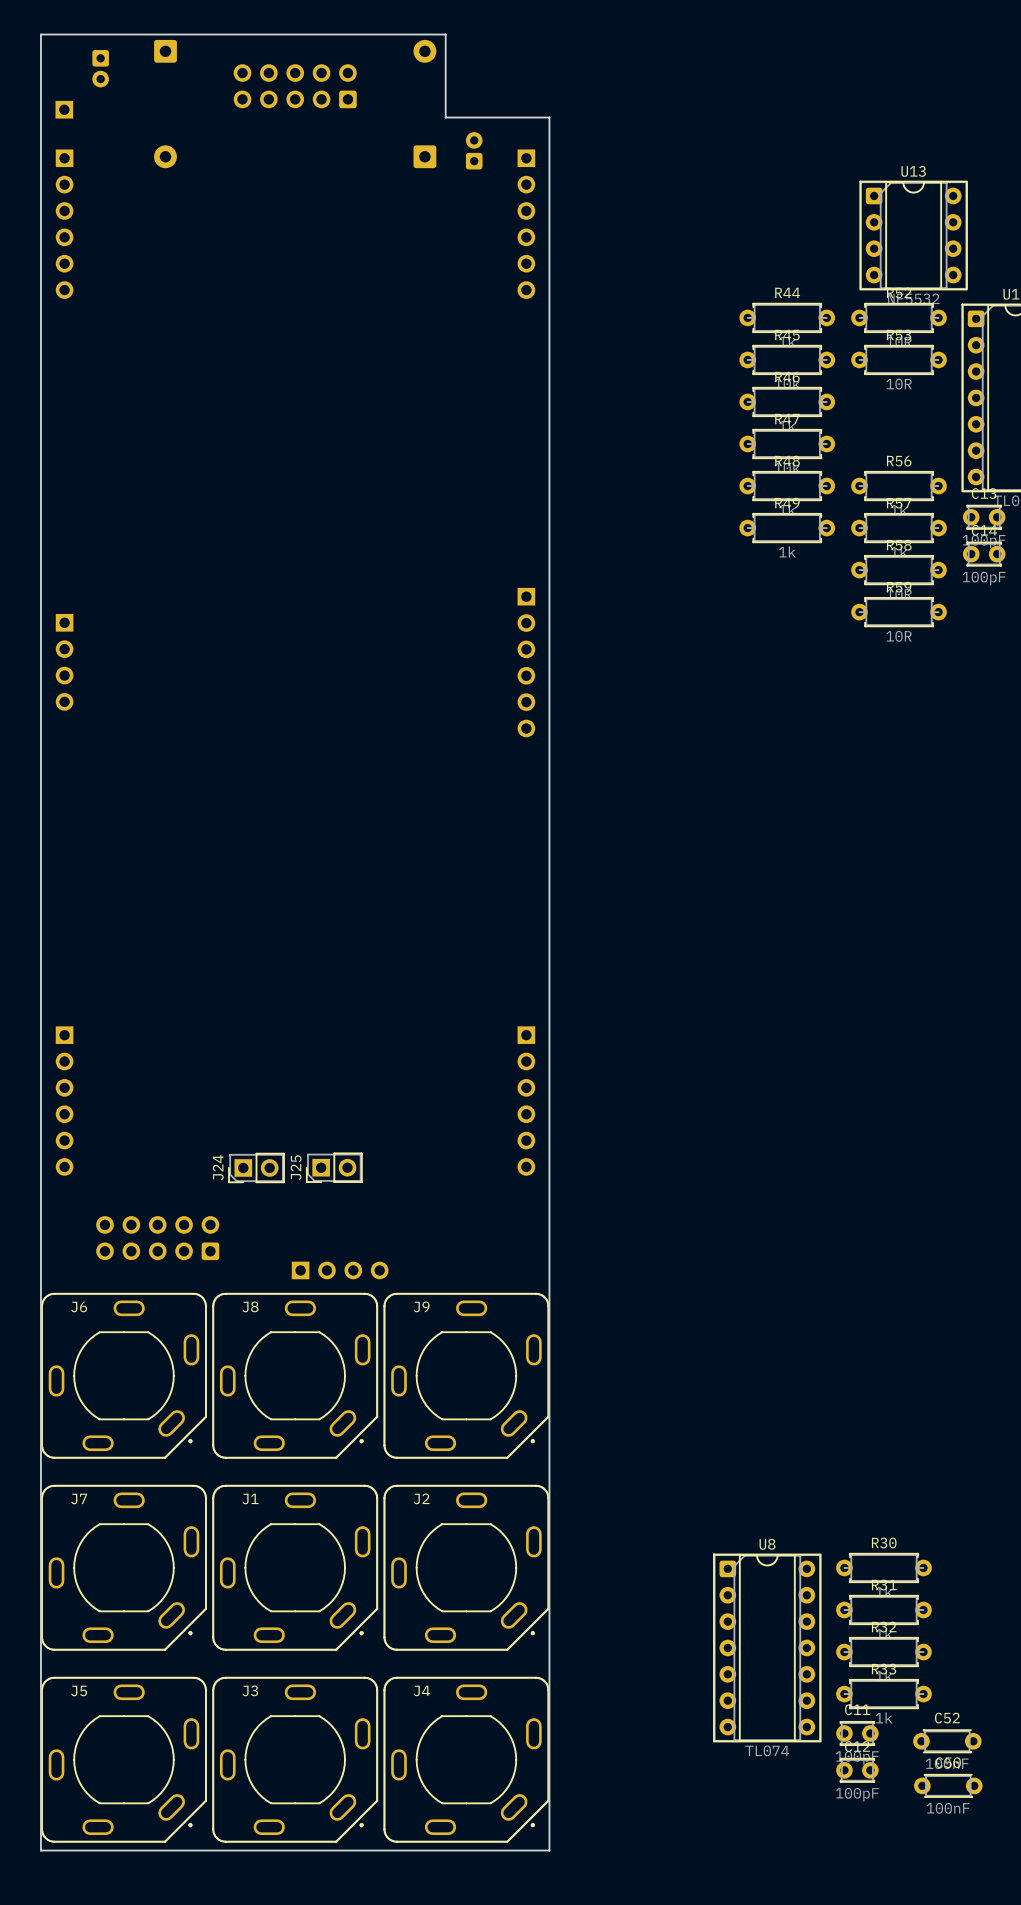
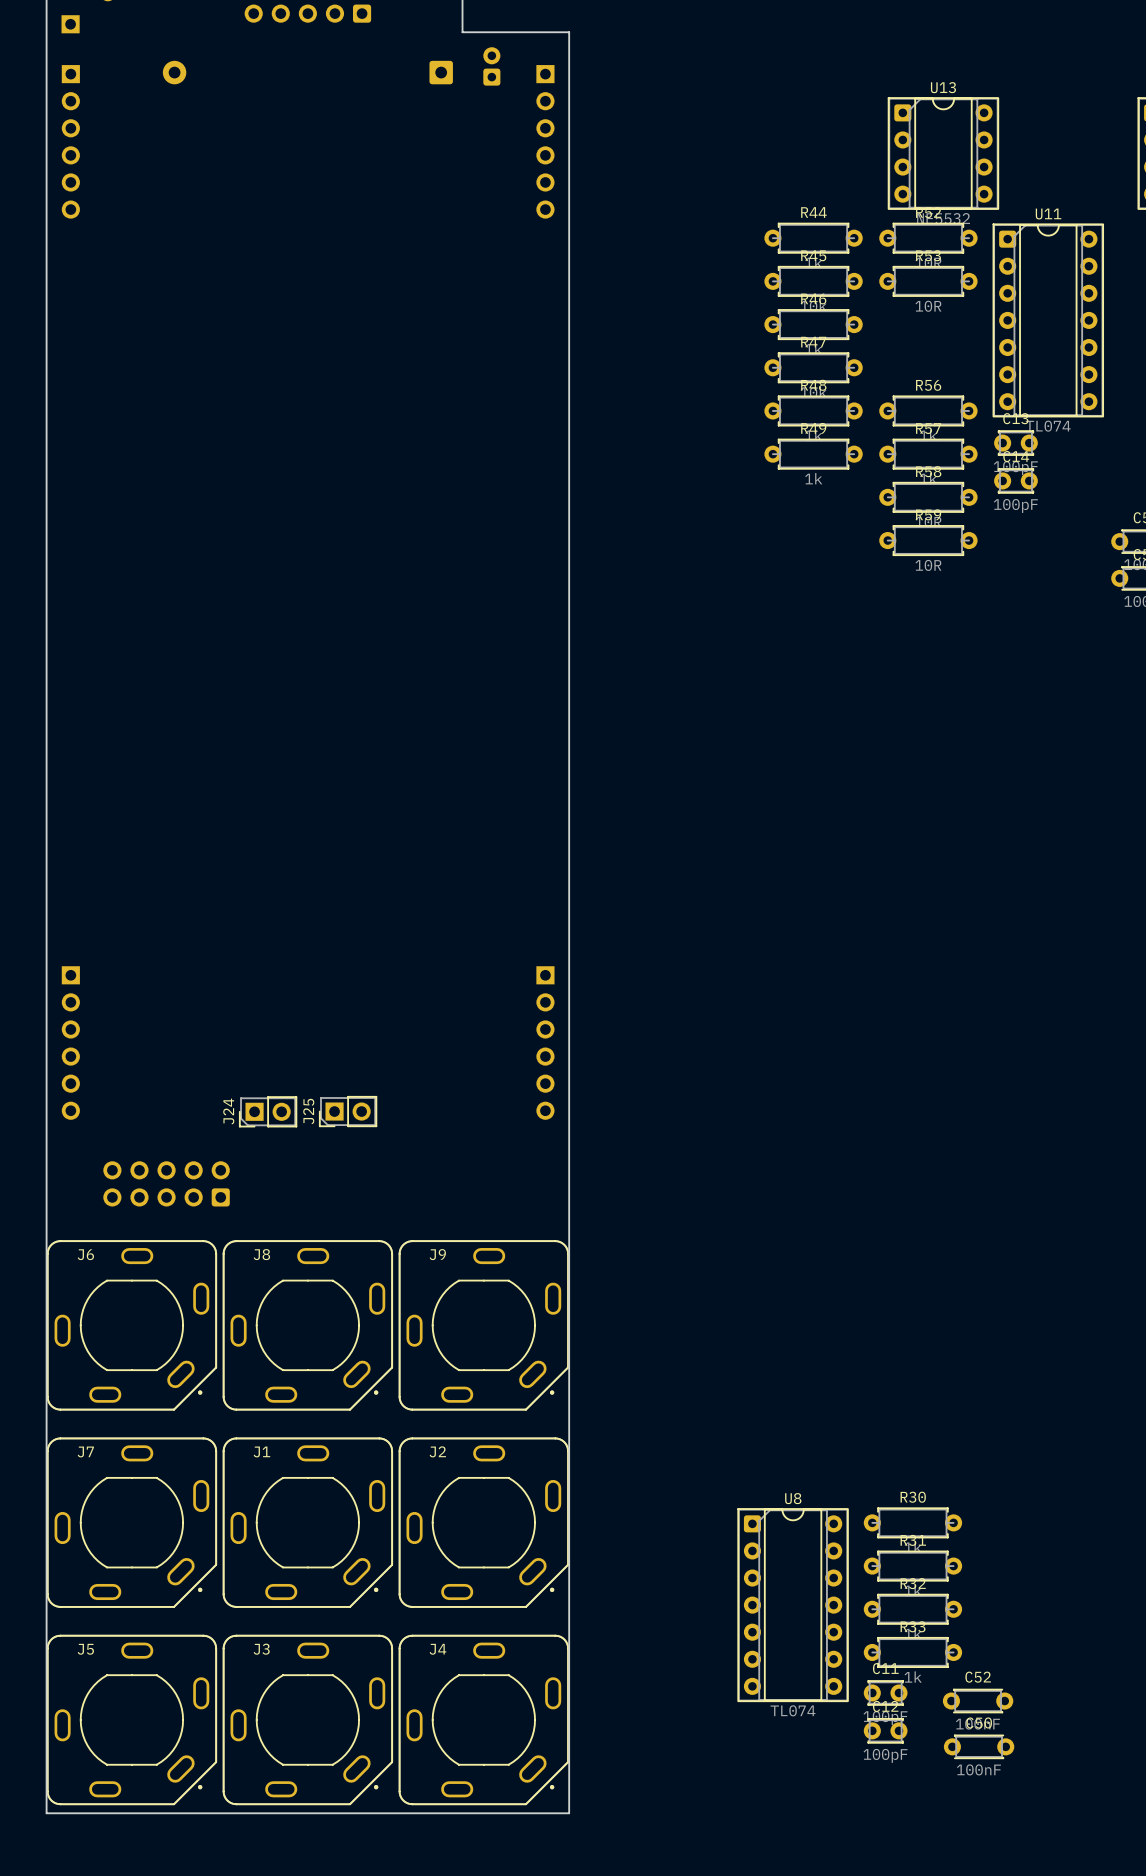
part: (64, 662) -> none
part: (526, 662) -> none
part: (340, 1270) -> none

